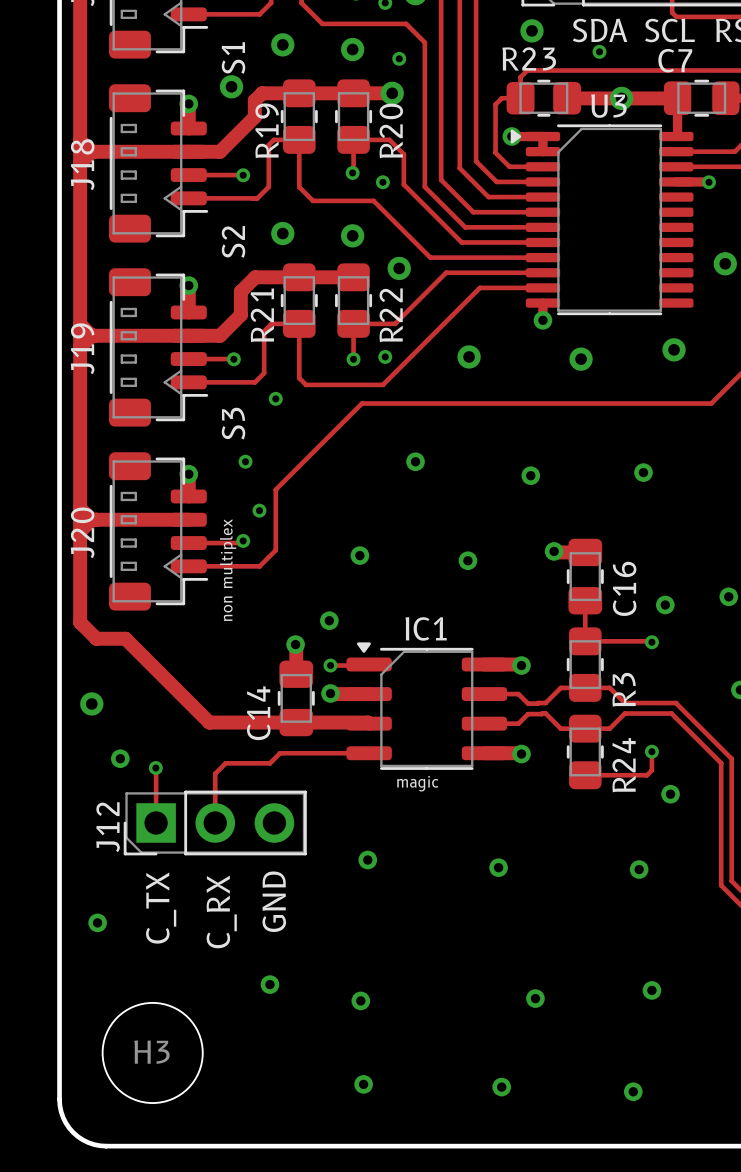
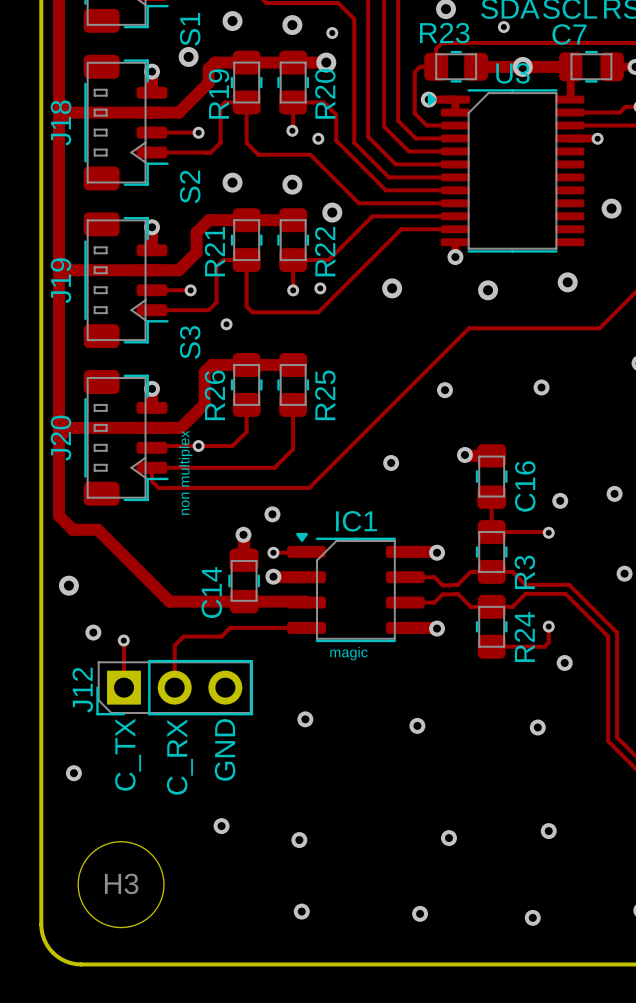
track: (558, 403) (361, 403) (275, 489) (275, 550) (259, 566) -> (468, 328) (309, 487) (158, 487) (152, 481) (152, 467)
track: none -> (293, 365) (211, 365) (204, 372) (204, 404) (180, 427) (152, 427)
via: (245, 461) -> none
via: (415, 461) -> none
R26: none -> (246, 384)
R25: none -> (293, 384)
track: none -> (293, 404) (293, 449) (274, 467) (212, 467)
via: (259, 510) -> none
track: (243, 540) (241, 543) (188, 543) -> (246, 404) (246, 431) (232, 446) (153, 446) (152, 447)
via: (359, 555) -> none

